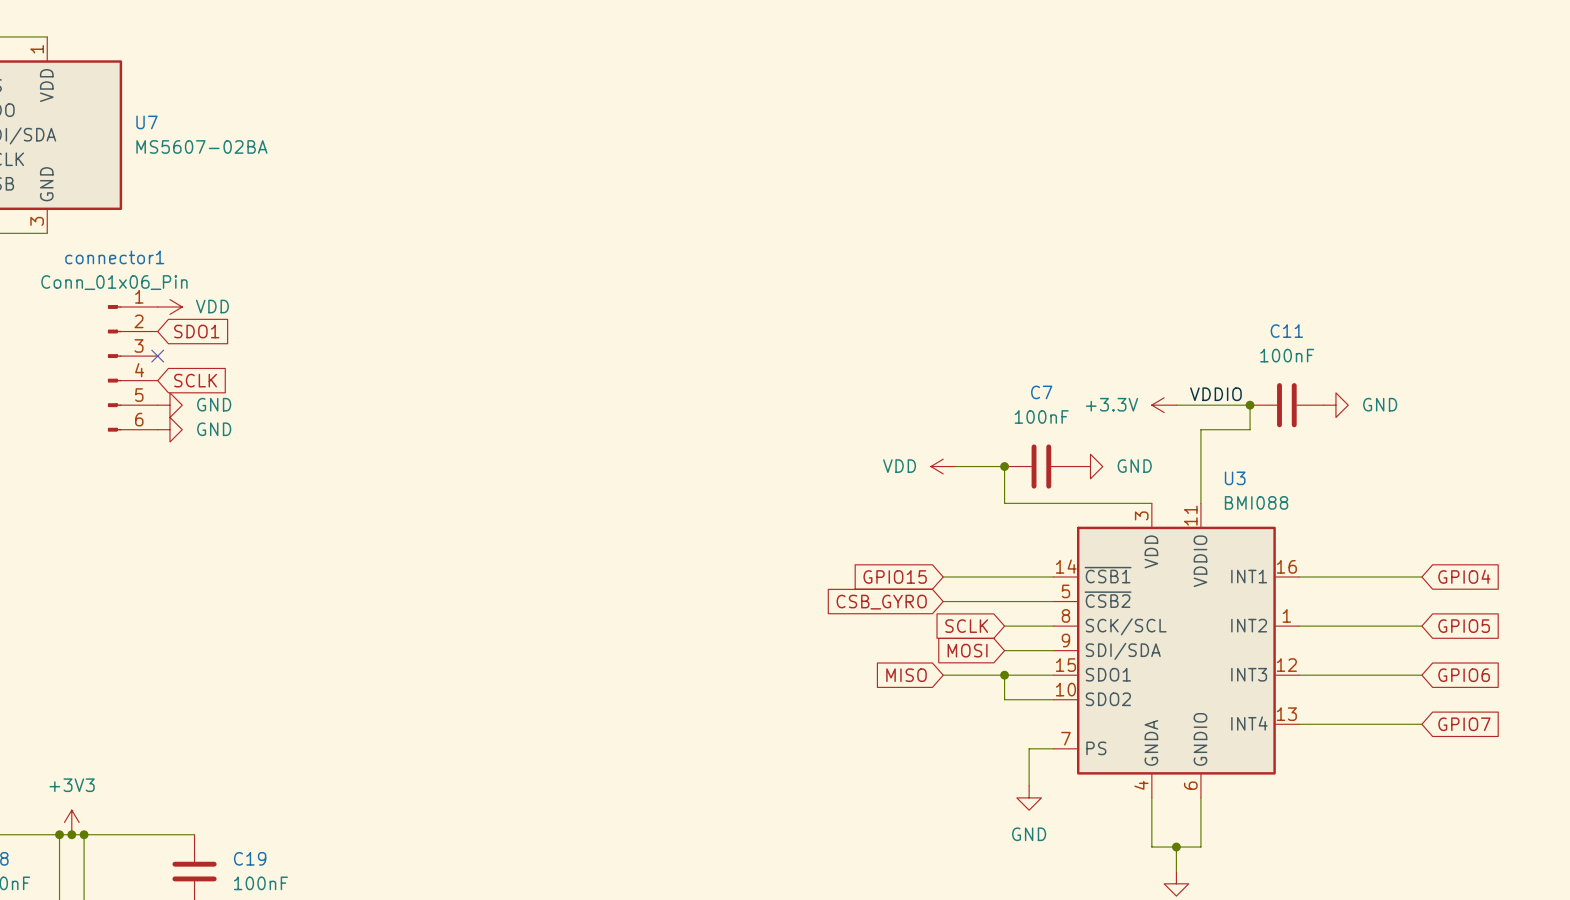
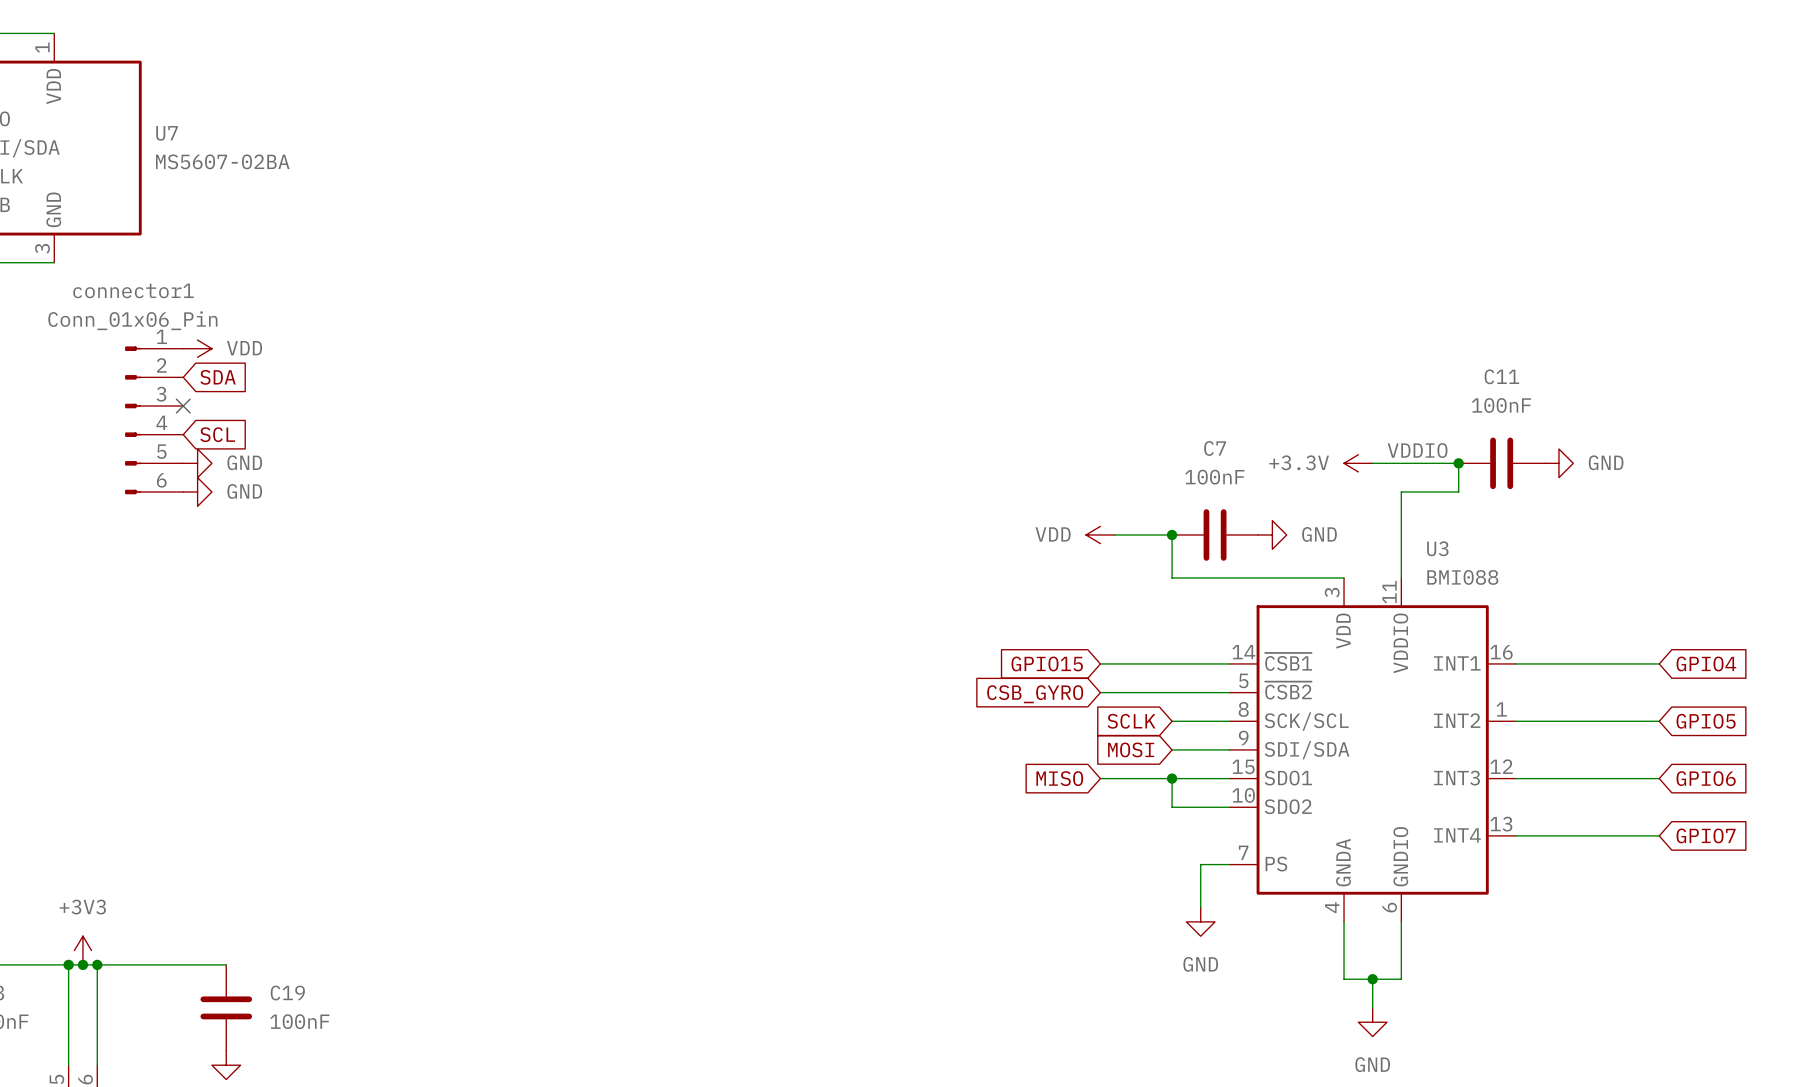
global label: SDO1 (196, 331) -> SDA (218, 377)
global label: SCLK (195, 380) -> SCL (217, 434)

